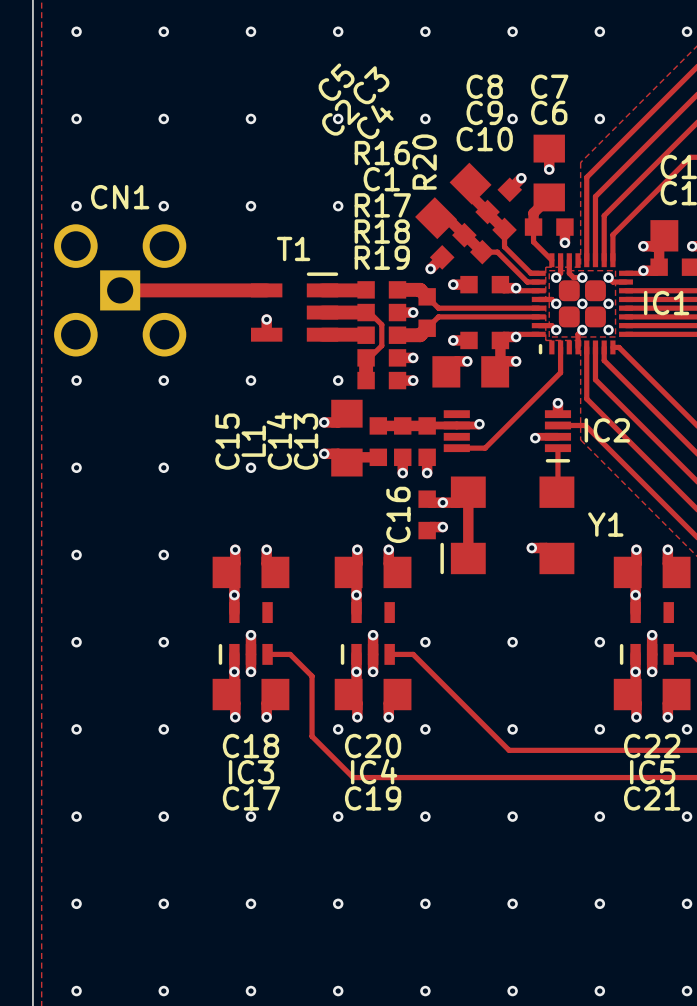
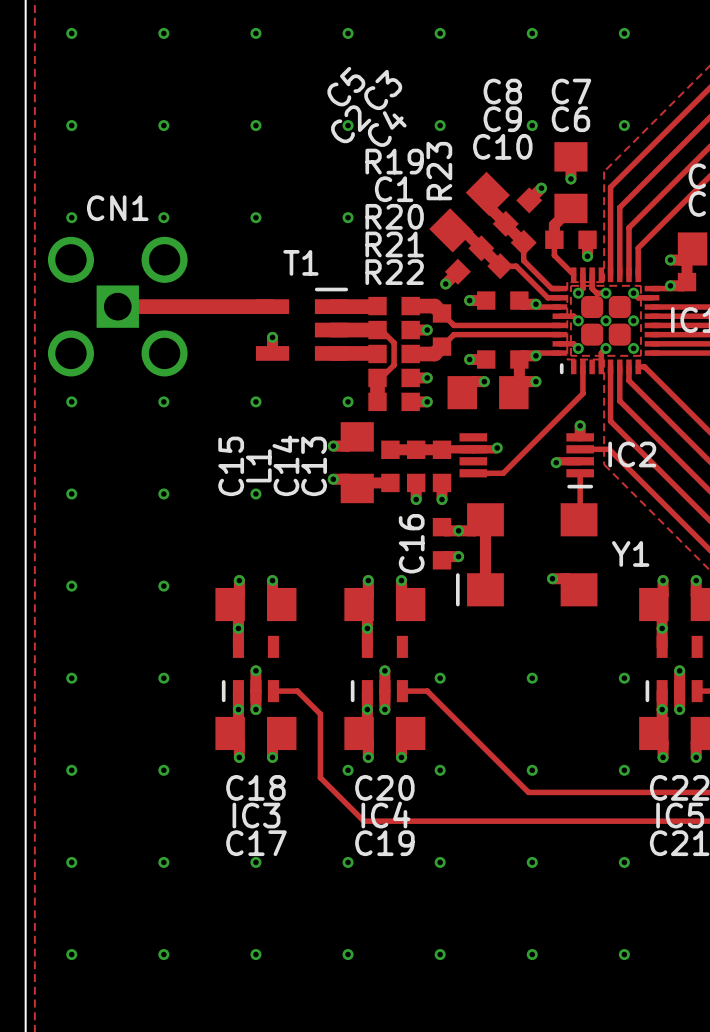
R16 name: R16 (382, 153) -> R19 (394, 161)
R20 name: R20 (424, 162) -> R23 (439, 171)
R17 name: R17 (382, 205) -> R20 (394, 216)
R18 name: R18 (382, 231) -> R21 (394, 244)
R19 name: R19 (382, 257) -> R22 (394, 272)

